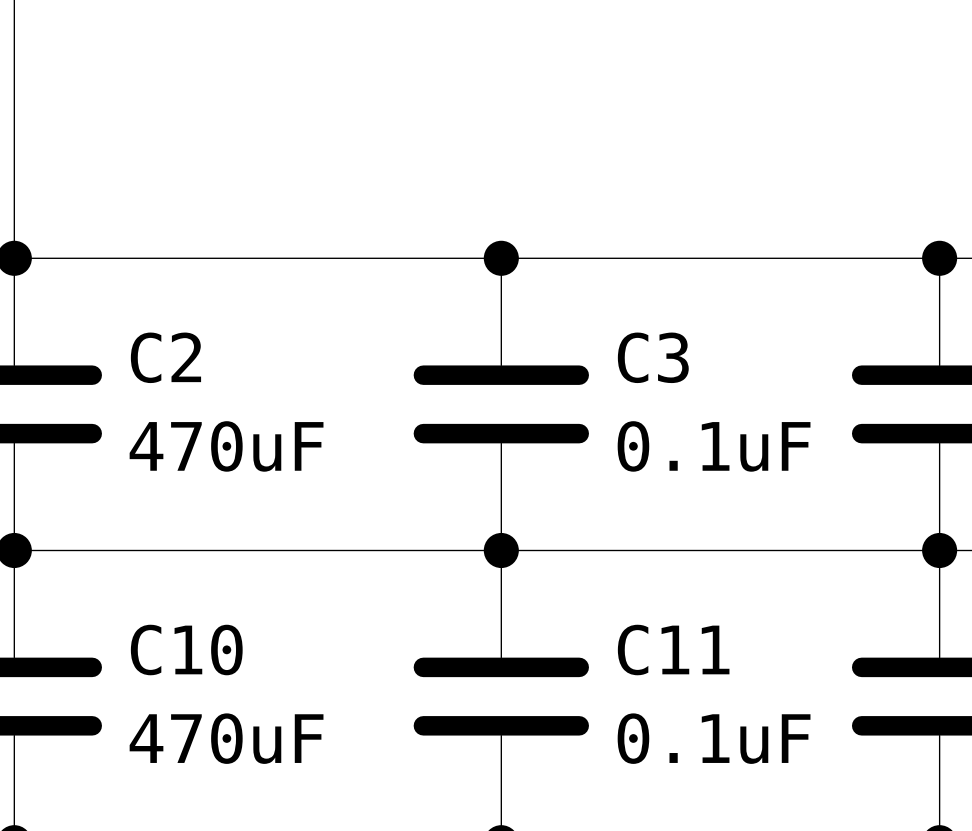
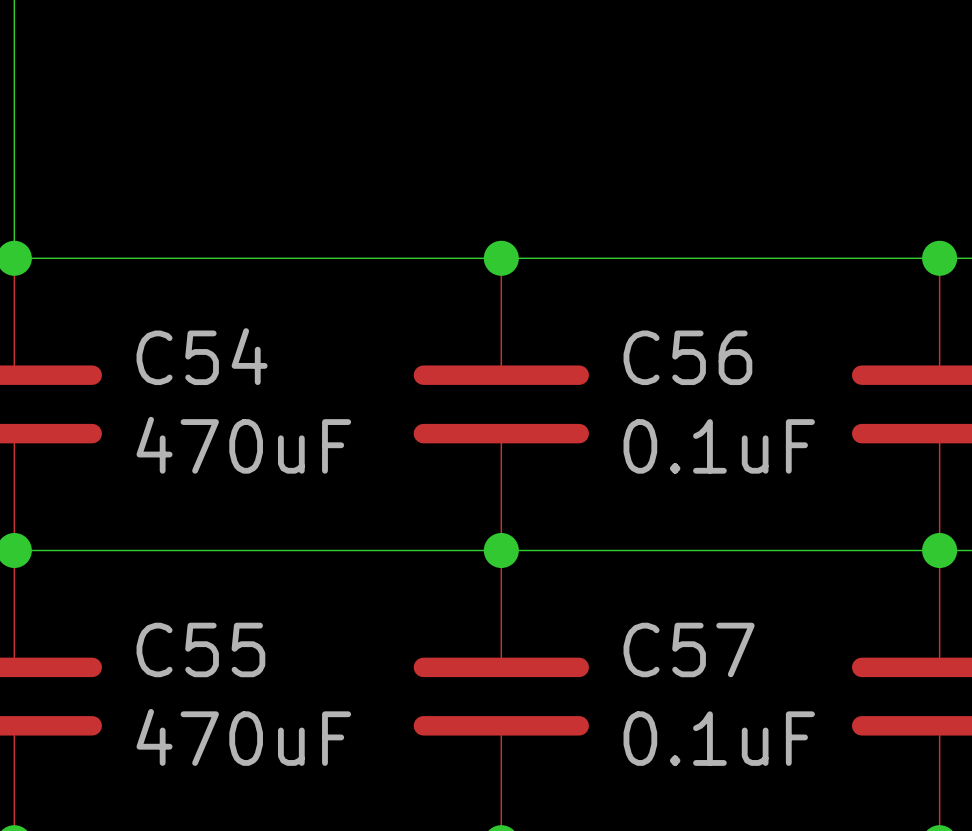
C2 name: C2 (165, 357) -> C54 (202, 356)
C3 name: C3 (653, 357) -> C56 (687, 357)
C10 name: C10 (186, 650) -> C55 (200, 649)
C11 name: C11 (673, 650) -> C57 (689, 649)

